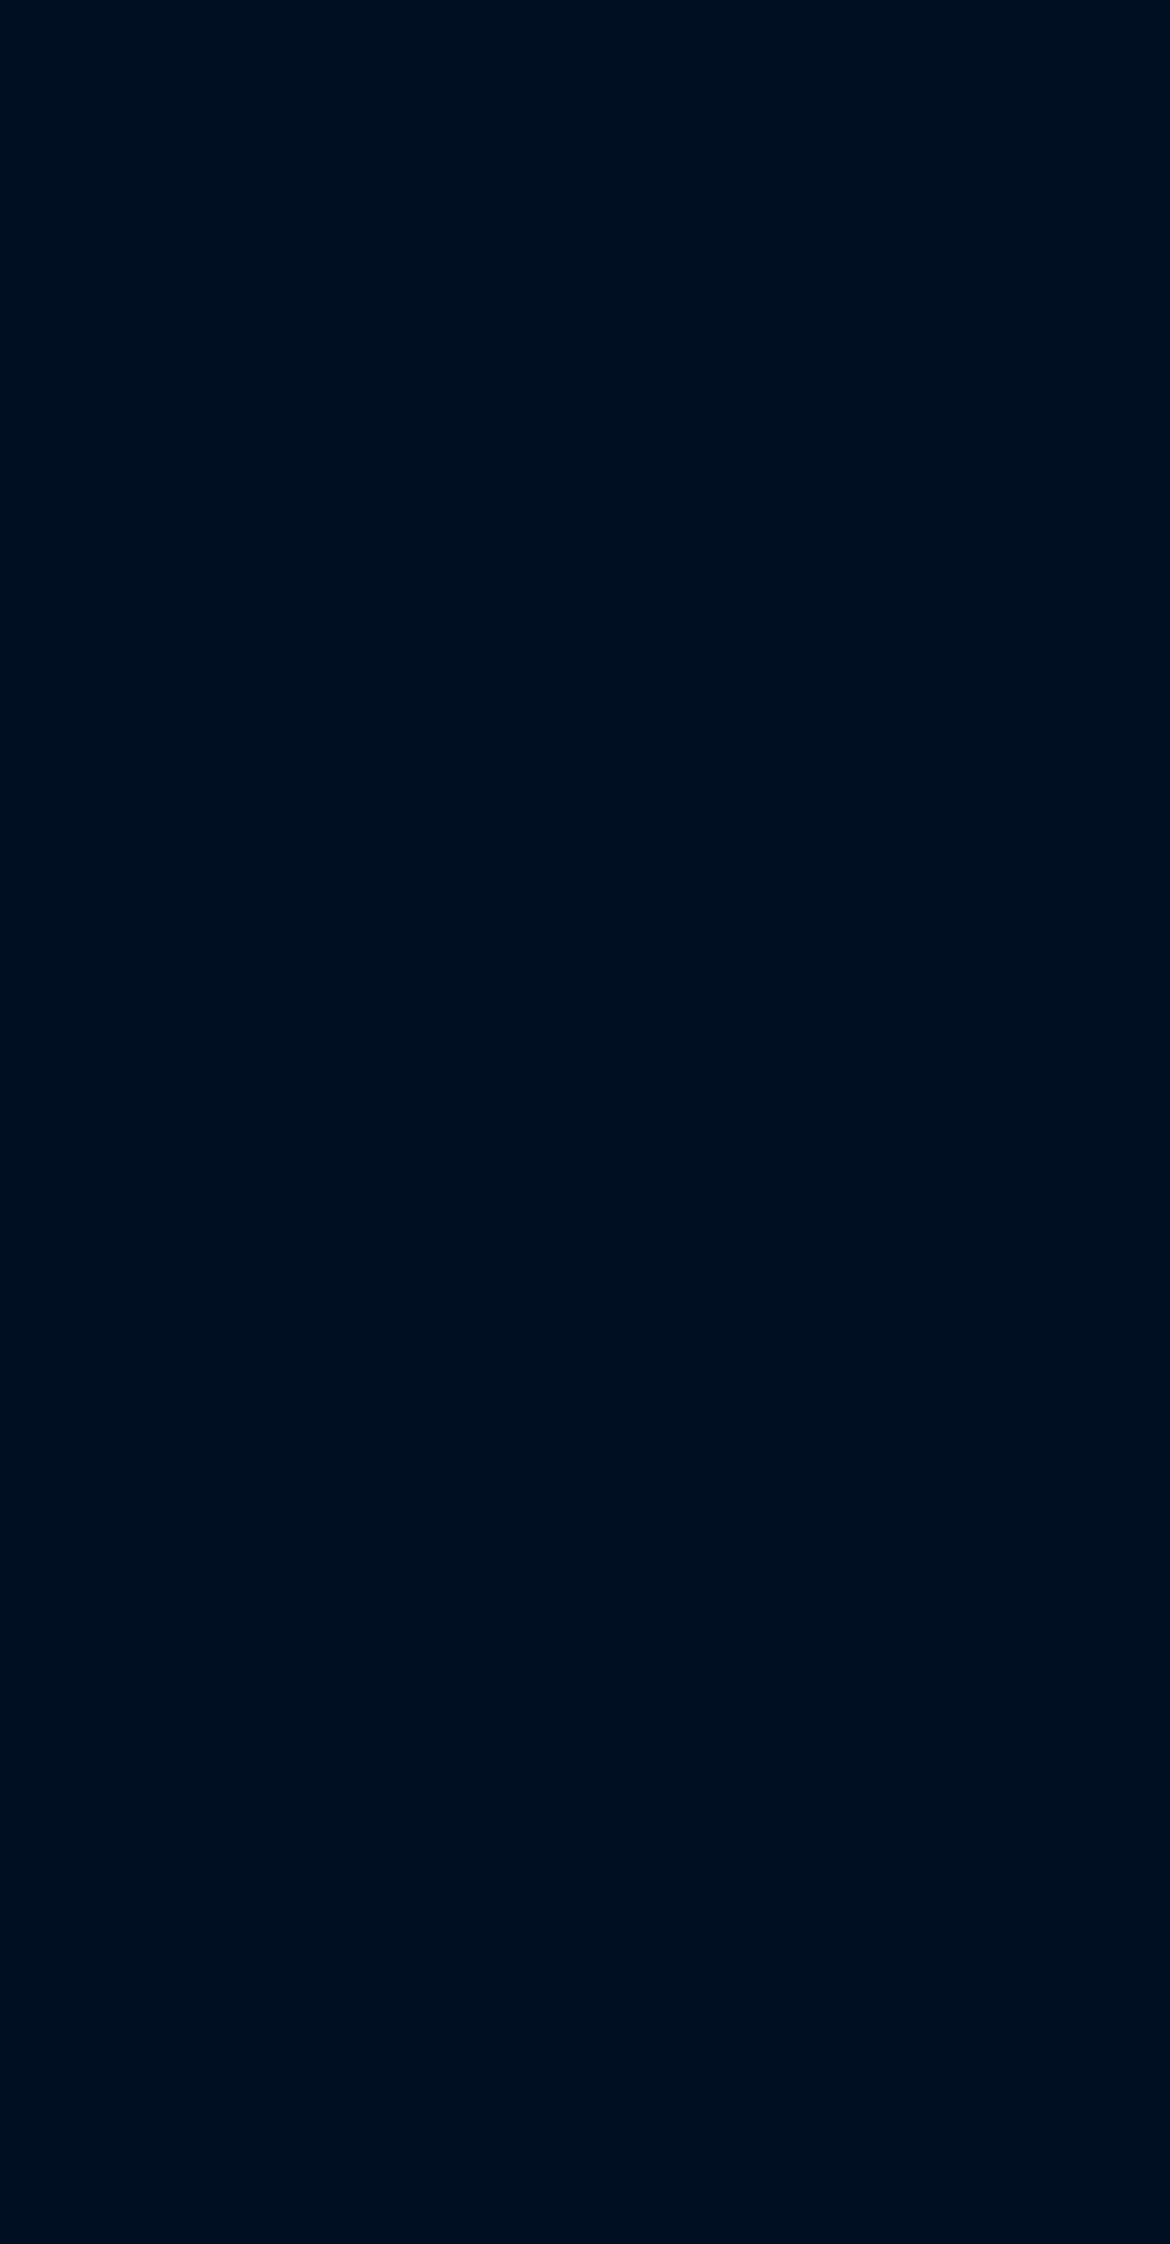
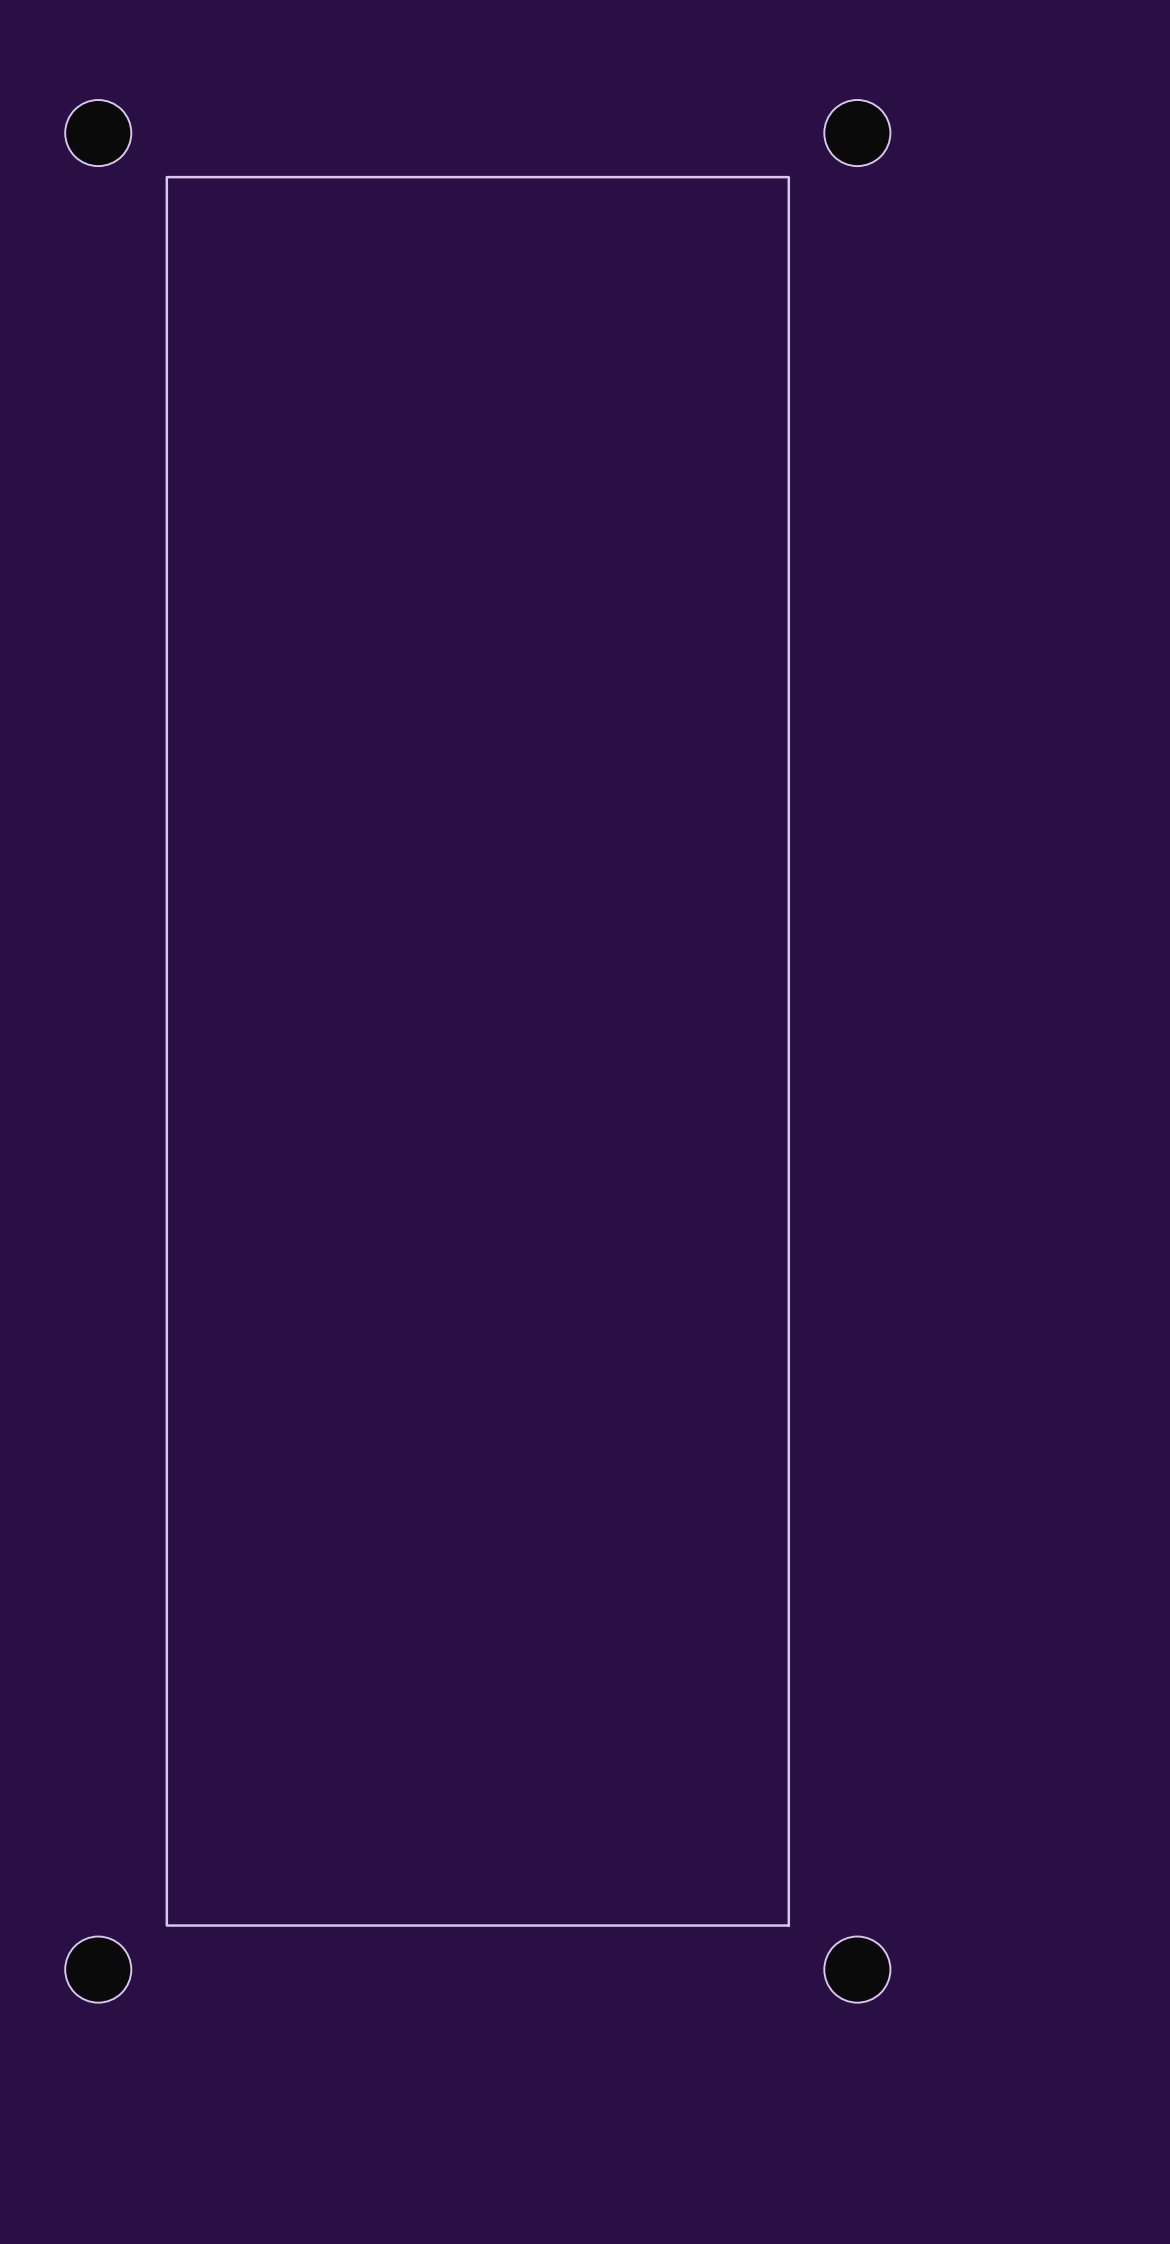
part: none -> (477, 1051)

